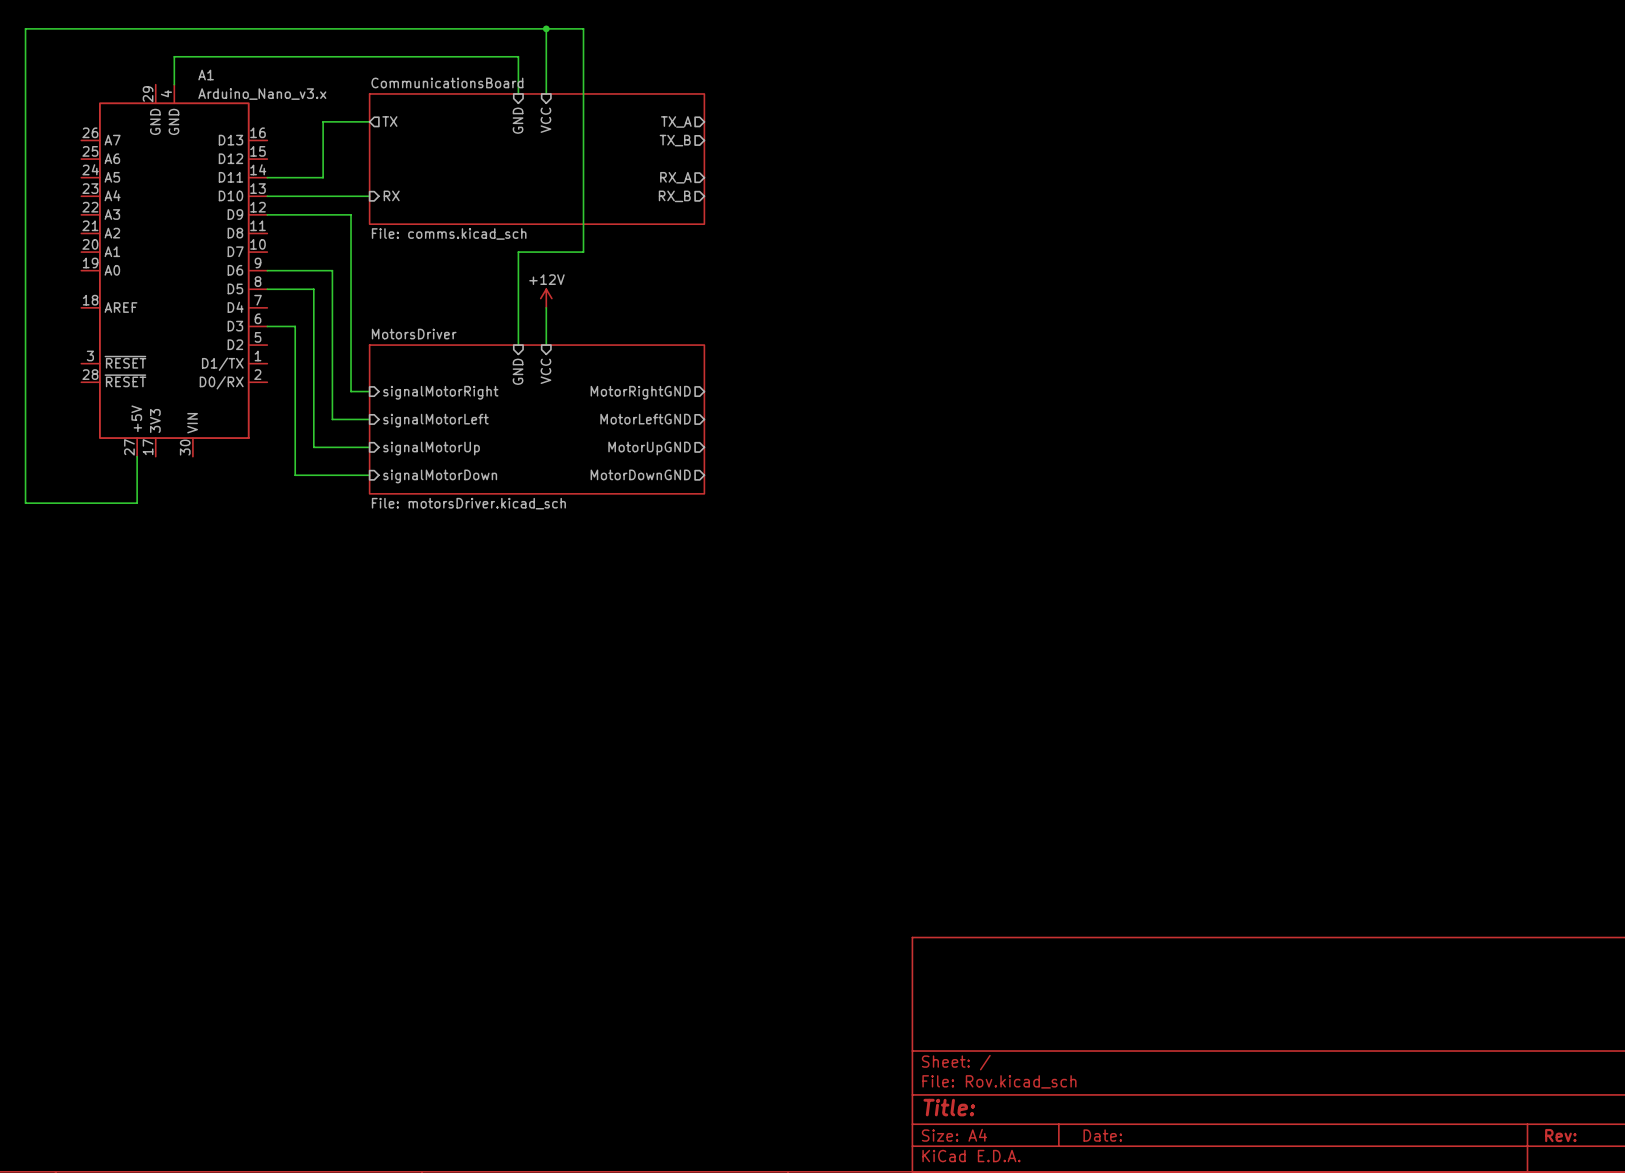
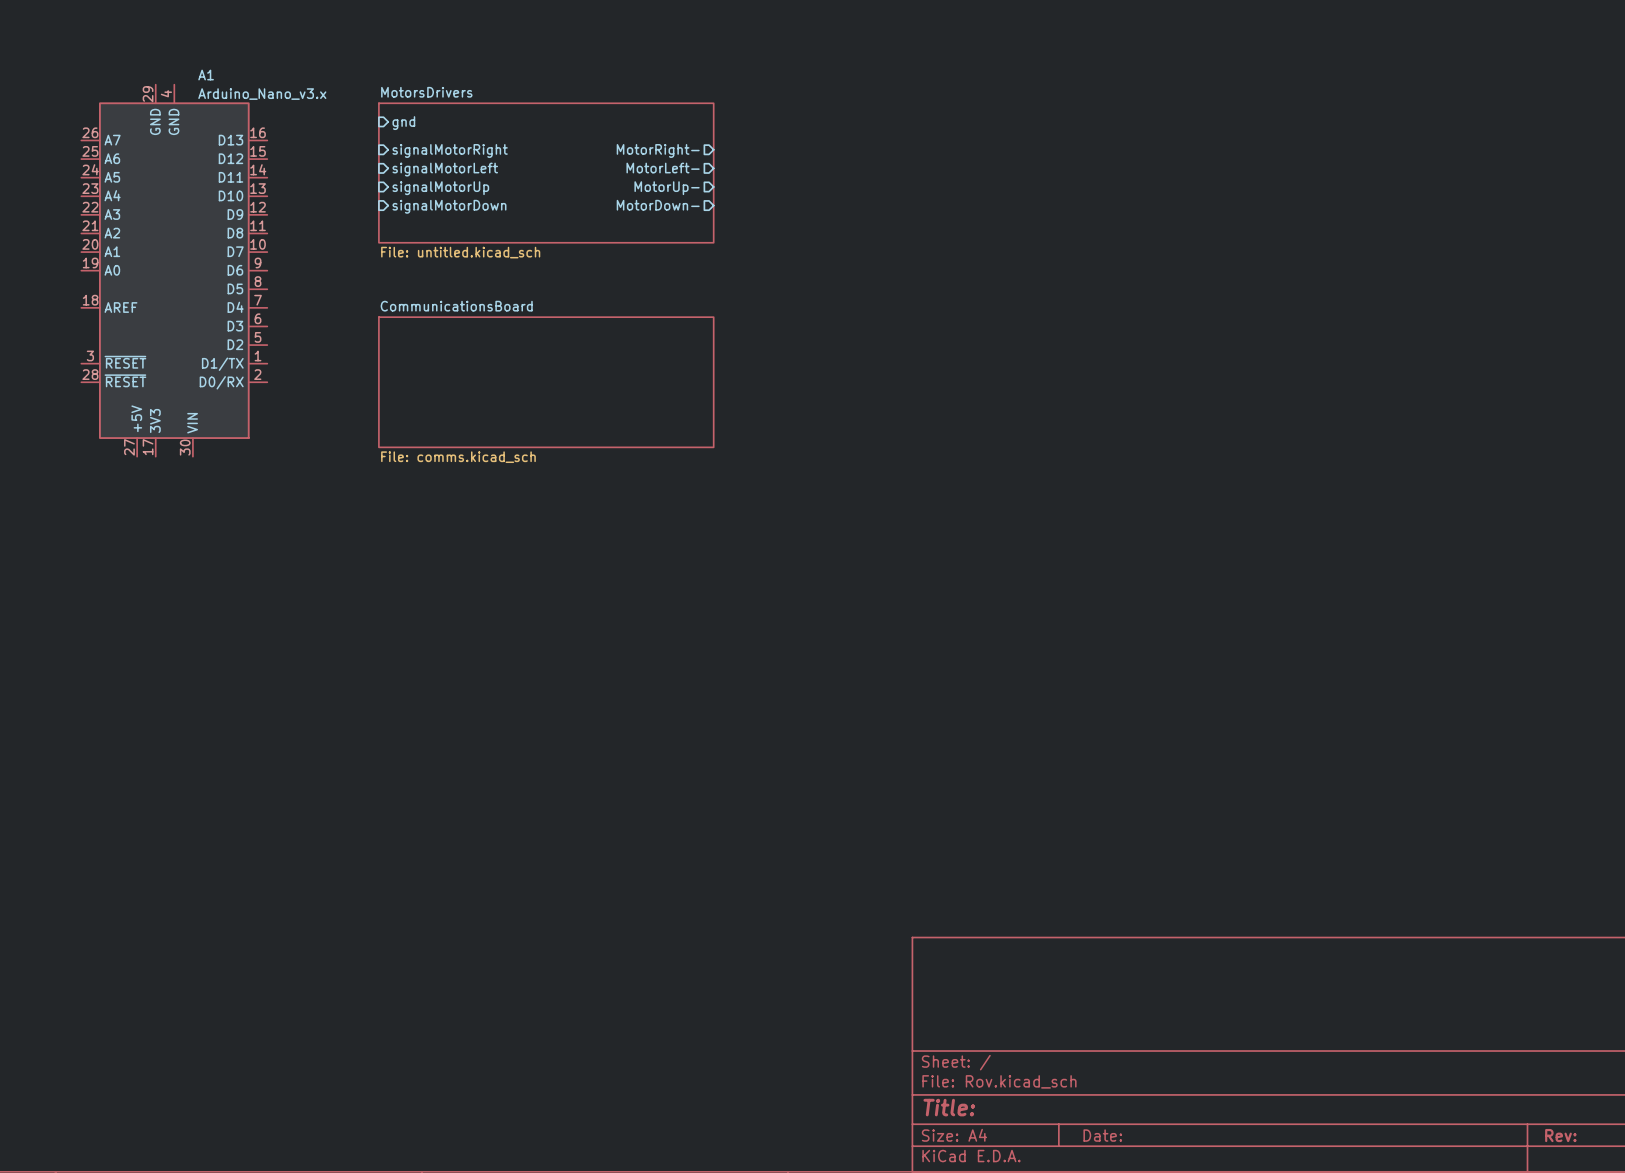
wire: (546, 28) (546, 93) -> none
junction: (546, 28) -> none
wire: (174, 84) (174, 56) (518, 56) (518, 93) -> none
sheet pin: GND (518, 120) -> none
sheet pin: VCC (545, 120) -> none
wire: (369, 121) (323, 121) (323, 177) (267, 177) -> none
sheet pin: TX (389, 121) -> none
sheet pin: TX_A (676, 121) -> none
sheet pin: none -> gnd (403, 123)
sheet pin: TX_B (675, 140) -> none
sheet pin: none -> signalMotorRight (450, 150)
sheet pin: none -> MotorRight- (658, 150)
sheet CommunicationsBoard: File: comms.kicad_sch (537, 159) -> none
sheet pin: none -> MotorLeft- (663, 168)
sheet pin: none -> signalMotorLeft (445, 169)
sheet MotorsDrivers: none -> File: untitled.kicad_sch (546, 173)
sheet pin: RX_A (675, 177) -> none
sheet pin: none -> signalMotorUp (440, 188)
sheet pin: none -> MotorUp- (667, 188)
sheet pin: RX (391, 195) -> none
wire: (267, 196) (369, 196) -> none
sheet pin: RX_B (674, 196) -> none
sheet pin: none -> MotorDown- (658, 205)
sheet pin: none -> signalMotorDown (449, 206)
wire: (267, 214) (351, 214) (351, 391) (369, 391) -> none
wire: (267, 270) (332, 270) (332, 419) (369, 419) -> none
wire: (267, 289) (313, 289) (313, 447) (369, 447) -> none
power symbol: +12V (546, 298) -> none
wire: (546, 307) (546, 345) -> none
wire: (267, 326) (295, 326) (295, 475) (369, 475) -> none
wire: (518, 345) (518, 252) (583, 252) (583, 28) (25, 28) (25, 503) (137, 503) (137, 456) -> none
sheet pin: GND (518, 371) -> none
sheet pin: VCC (545, 371) -> none
sheet CommunicationsBoard: none -> File: comms.kicad_sch (546, 382)
sheet pin: signalMotorRight (440, 392) -> none
sheet pin: MotorRightGND (640, 392) -> none
sheet MotorsDriver: File: motorsDriver.kicad_sch (537, 419) -> none
sheet pin: MotorLeftGND (645, 419) -> none
sheet pin: signalMotorLeft (435, 420) -> none
sheet pin: signalMotorUp (431, 448) -> none
sheet pin: MotorUpGND (649, 448) -> none
sheet pin: MotorDownGND (640, 474) -> none
sheet pin: signalMotorDown (440, 476) -> none

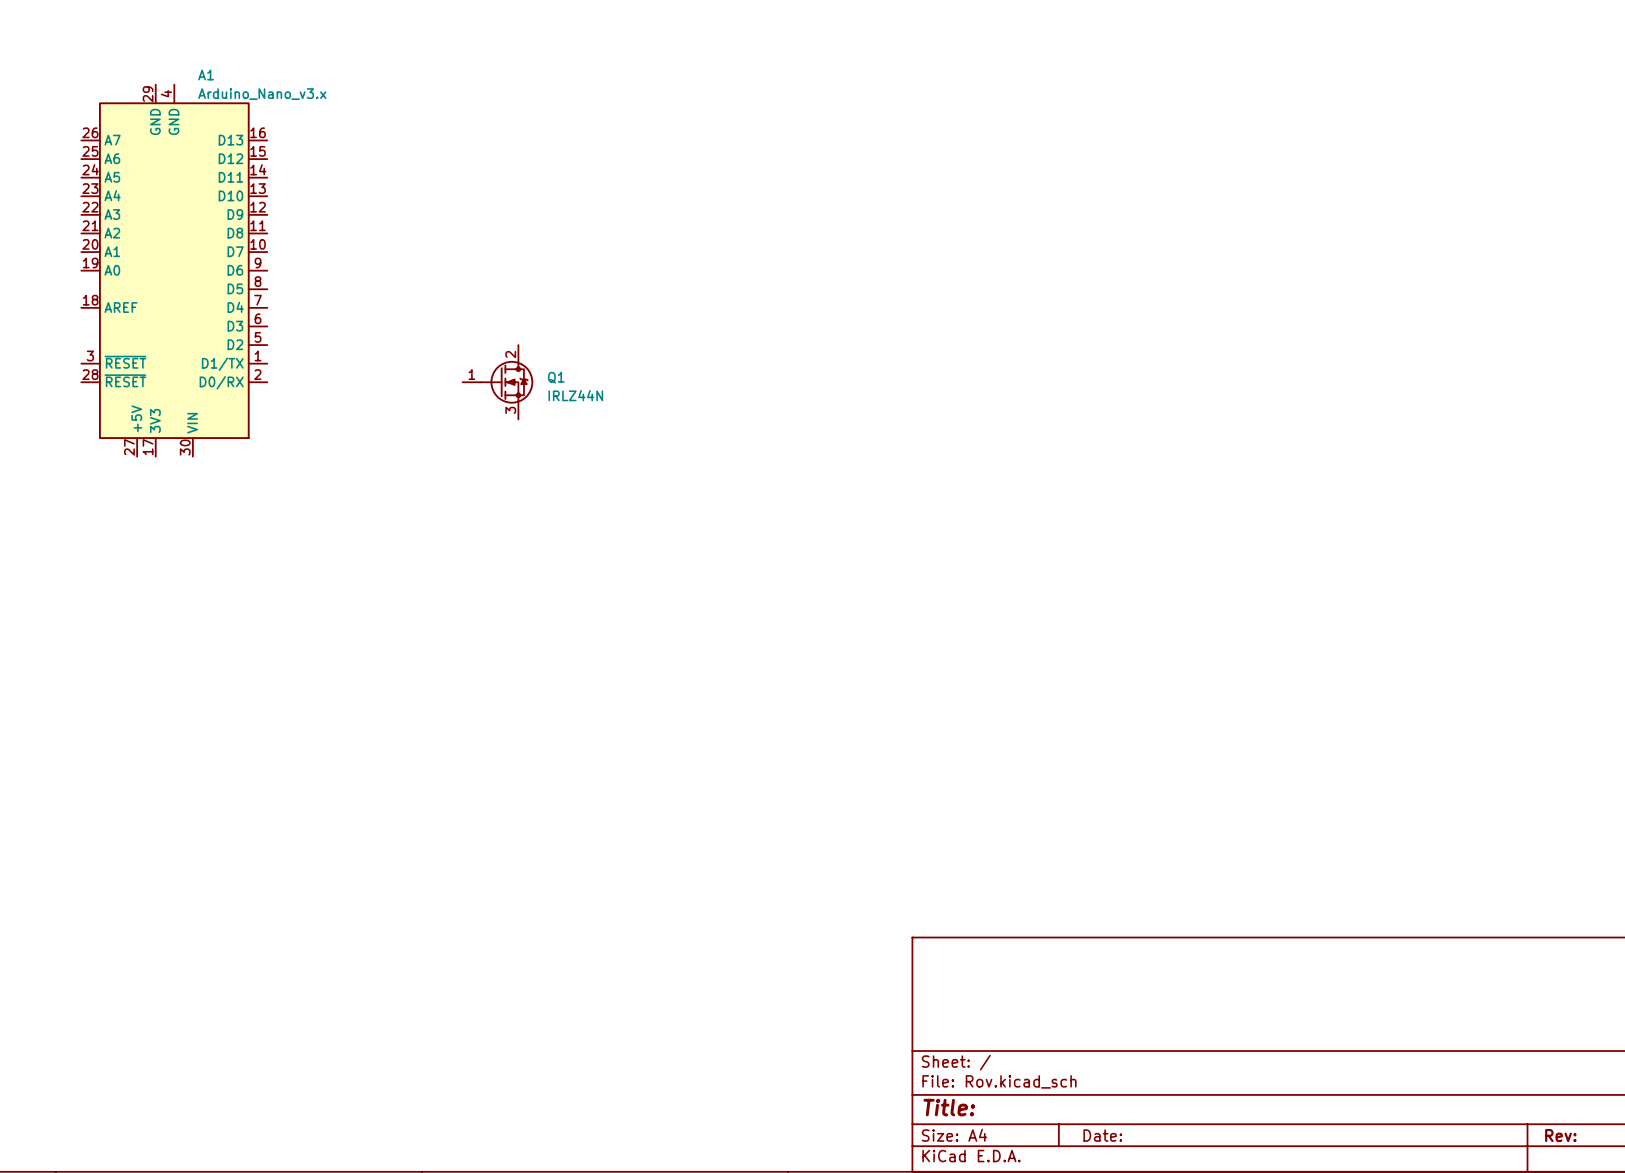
sheet pin: gnd (403, 123) -> none
sheet pin: signalMotorRight (450, 150) -> none
sheet pin: MotorRight- (658, 150) -> none
sheet pin: MotorLeft- (663, 168) -> none
sheet pin: signalMotorLeft (445, 169) -> none
sheet MotorsDrivers: File: untitled.kicad_sch (546, 173) -> none
sheet pin: signalMotorUp (440, 188) -> none
sheet pin: MotorUp- (667, 188) -> none
sheet pin: MotorDown- (658, 205) -> none
sheet pin: signalMotorDown (449, 206) -> none
Q1: none -> IRLZ44N (497, 382)
sheet CommunicationsBoard: File: comms.kicad_sch (546, 382) -> none

